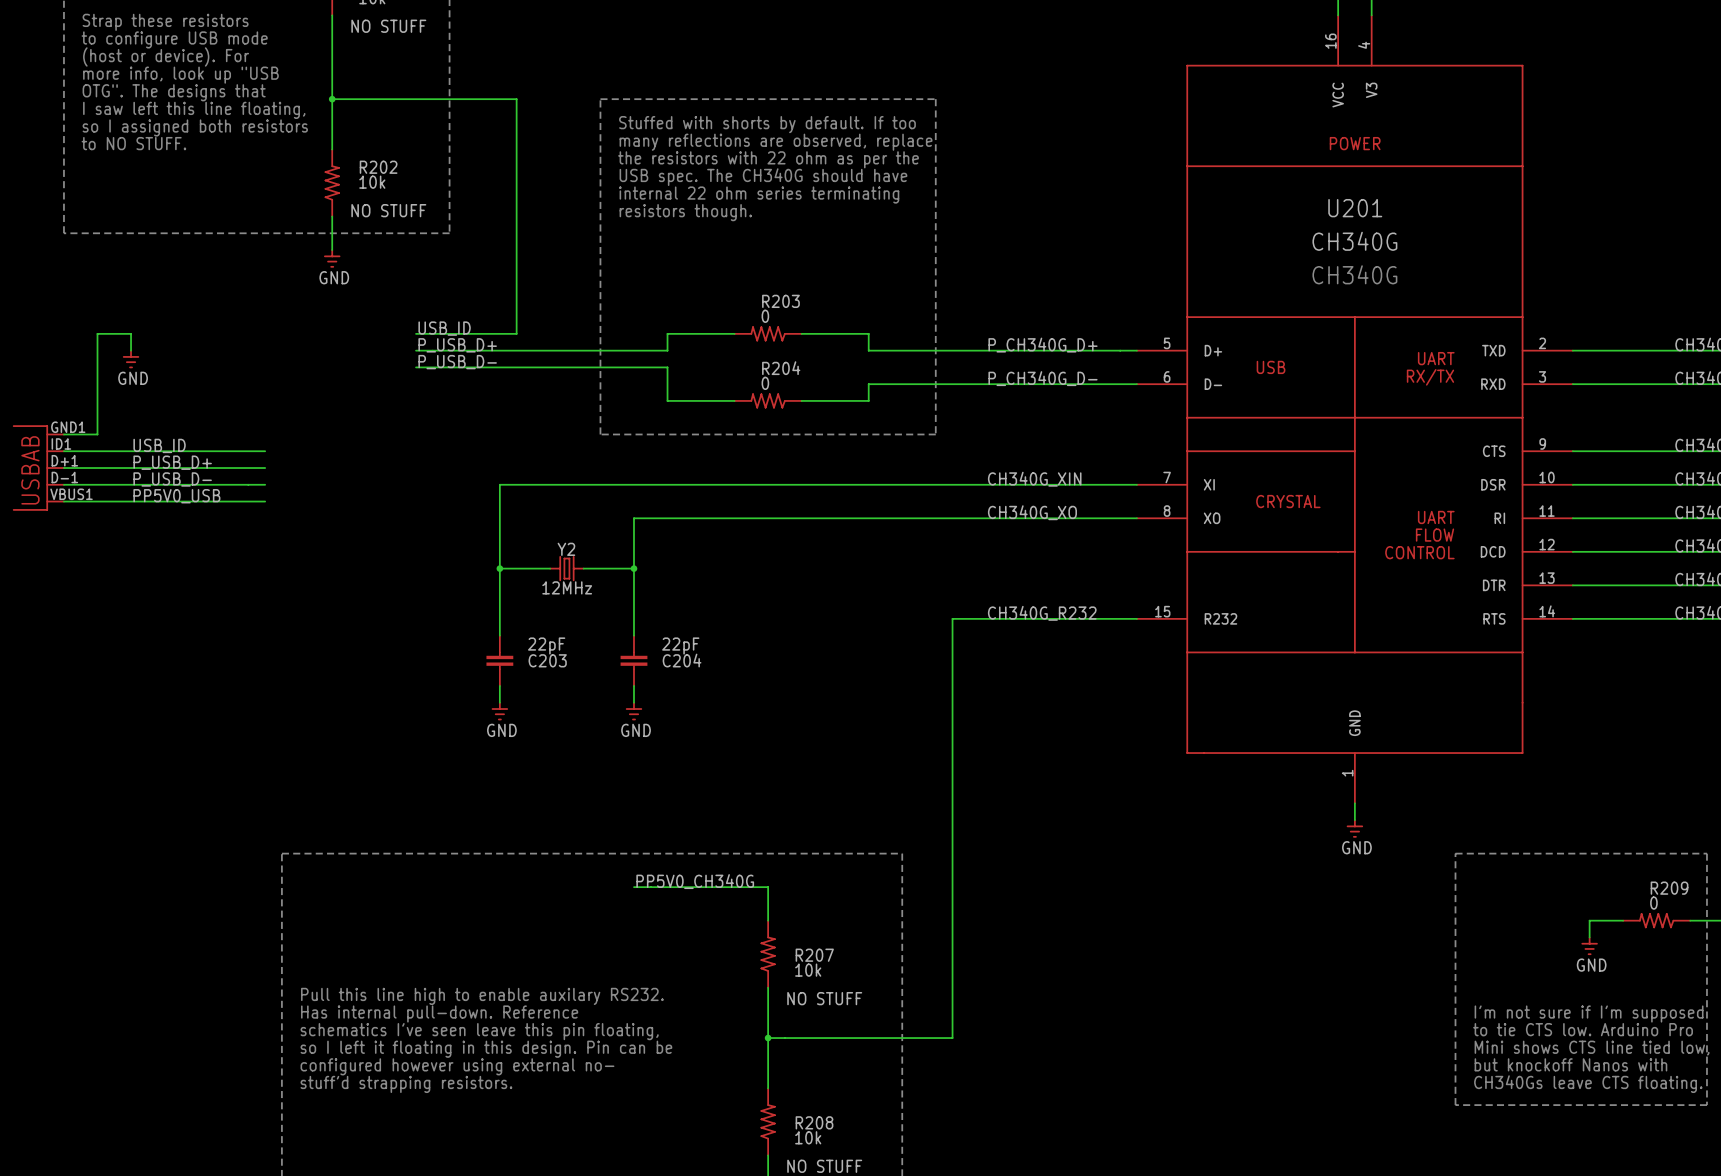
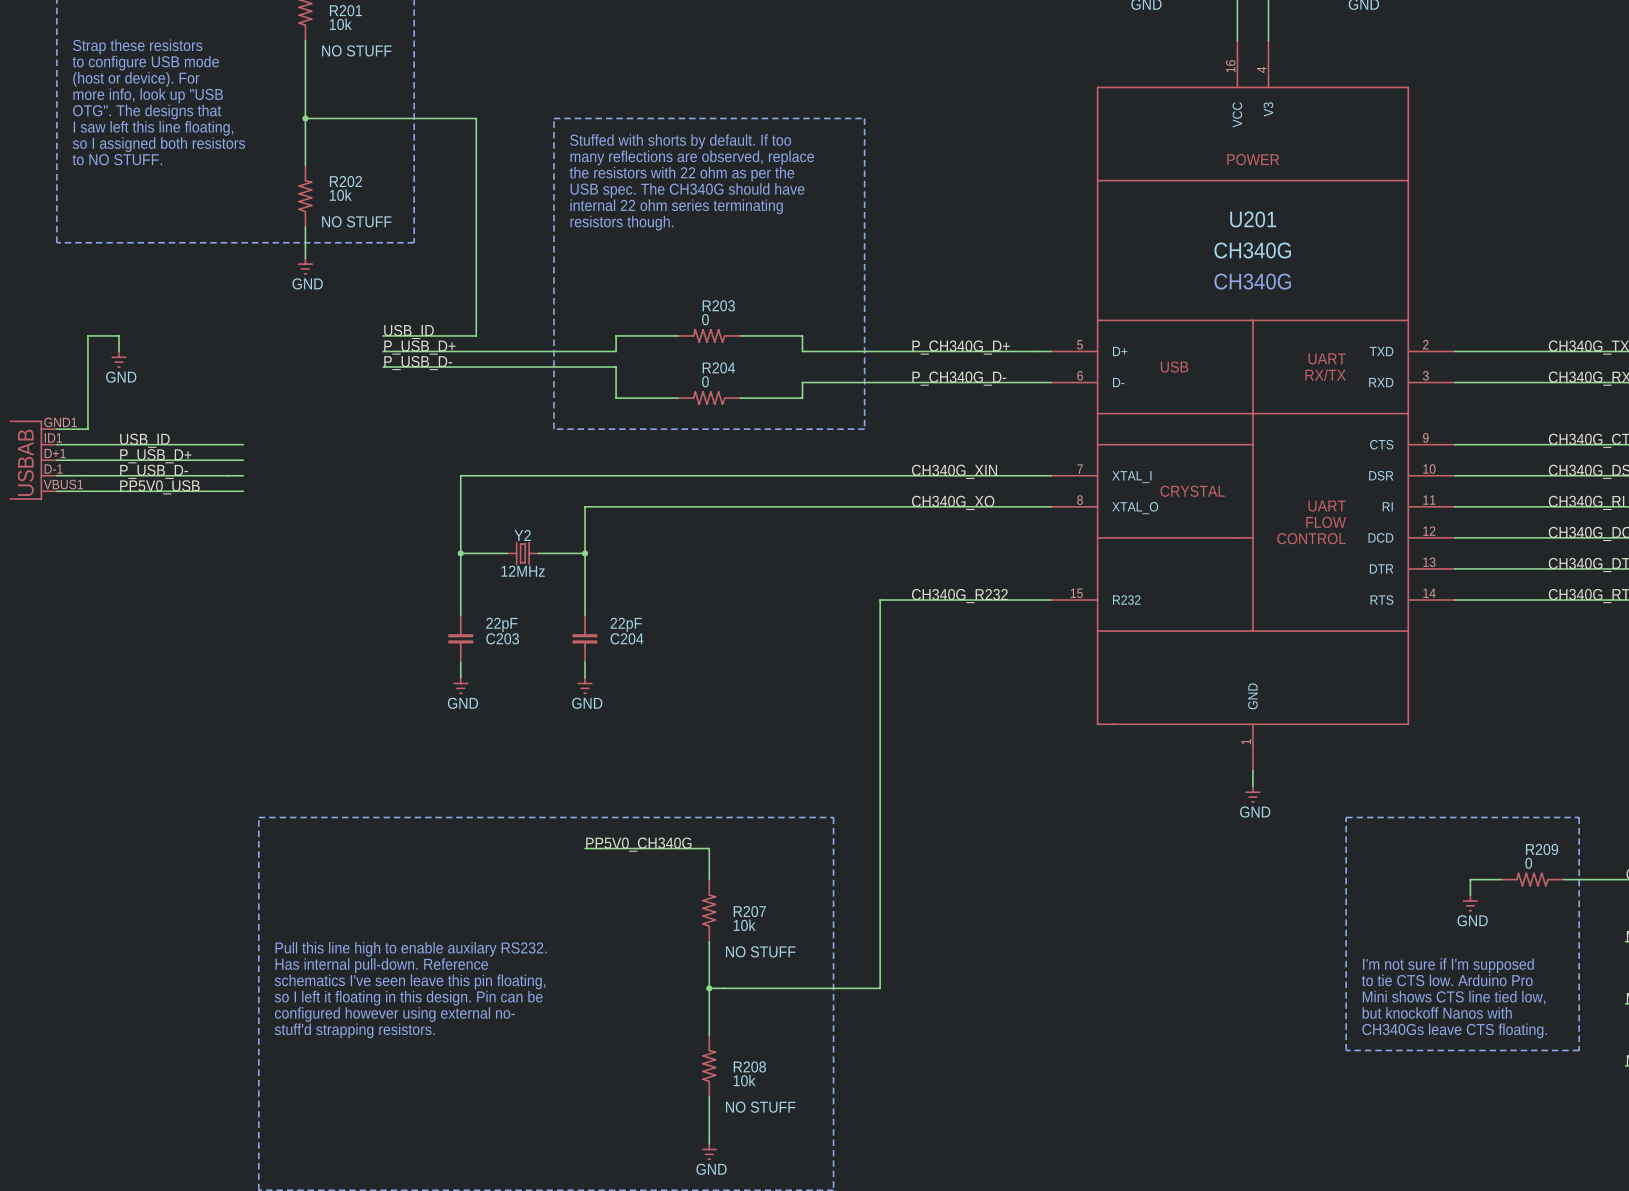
U201 pin name: XI (1209, 484) -> XTAL_I (1131, 477)
U201 pin name: XO (1212, 518) -> XTAL_O (1135, 508)

